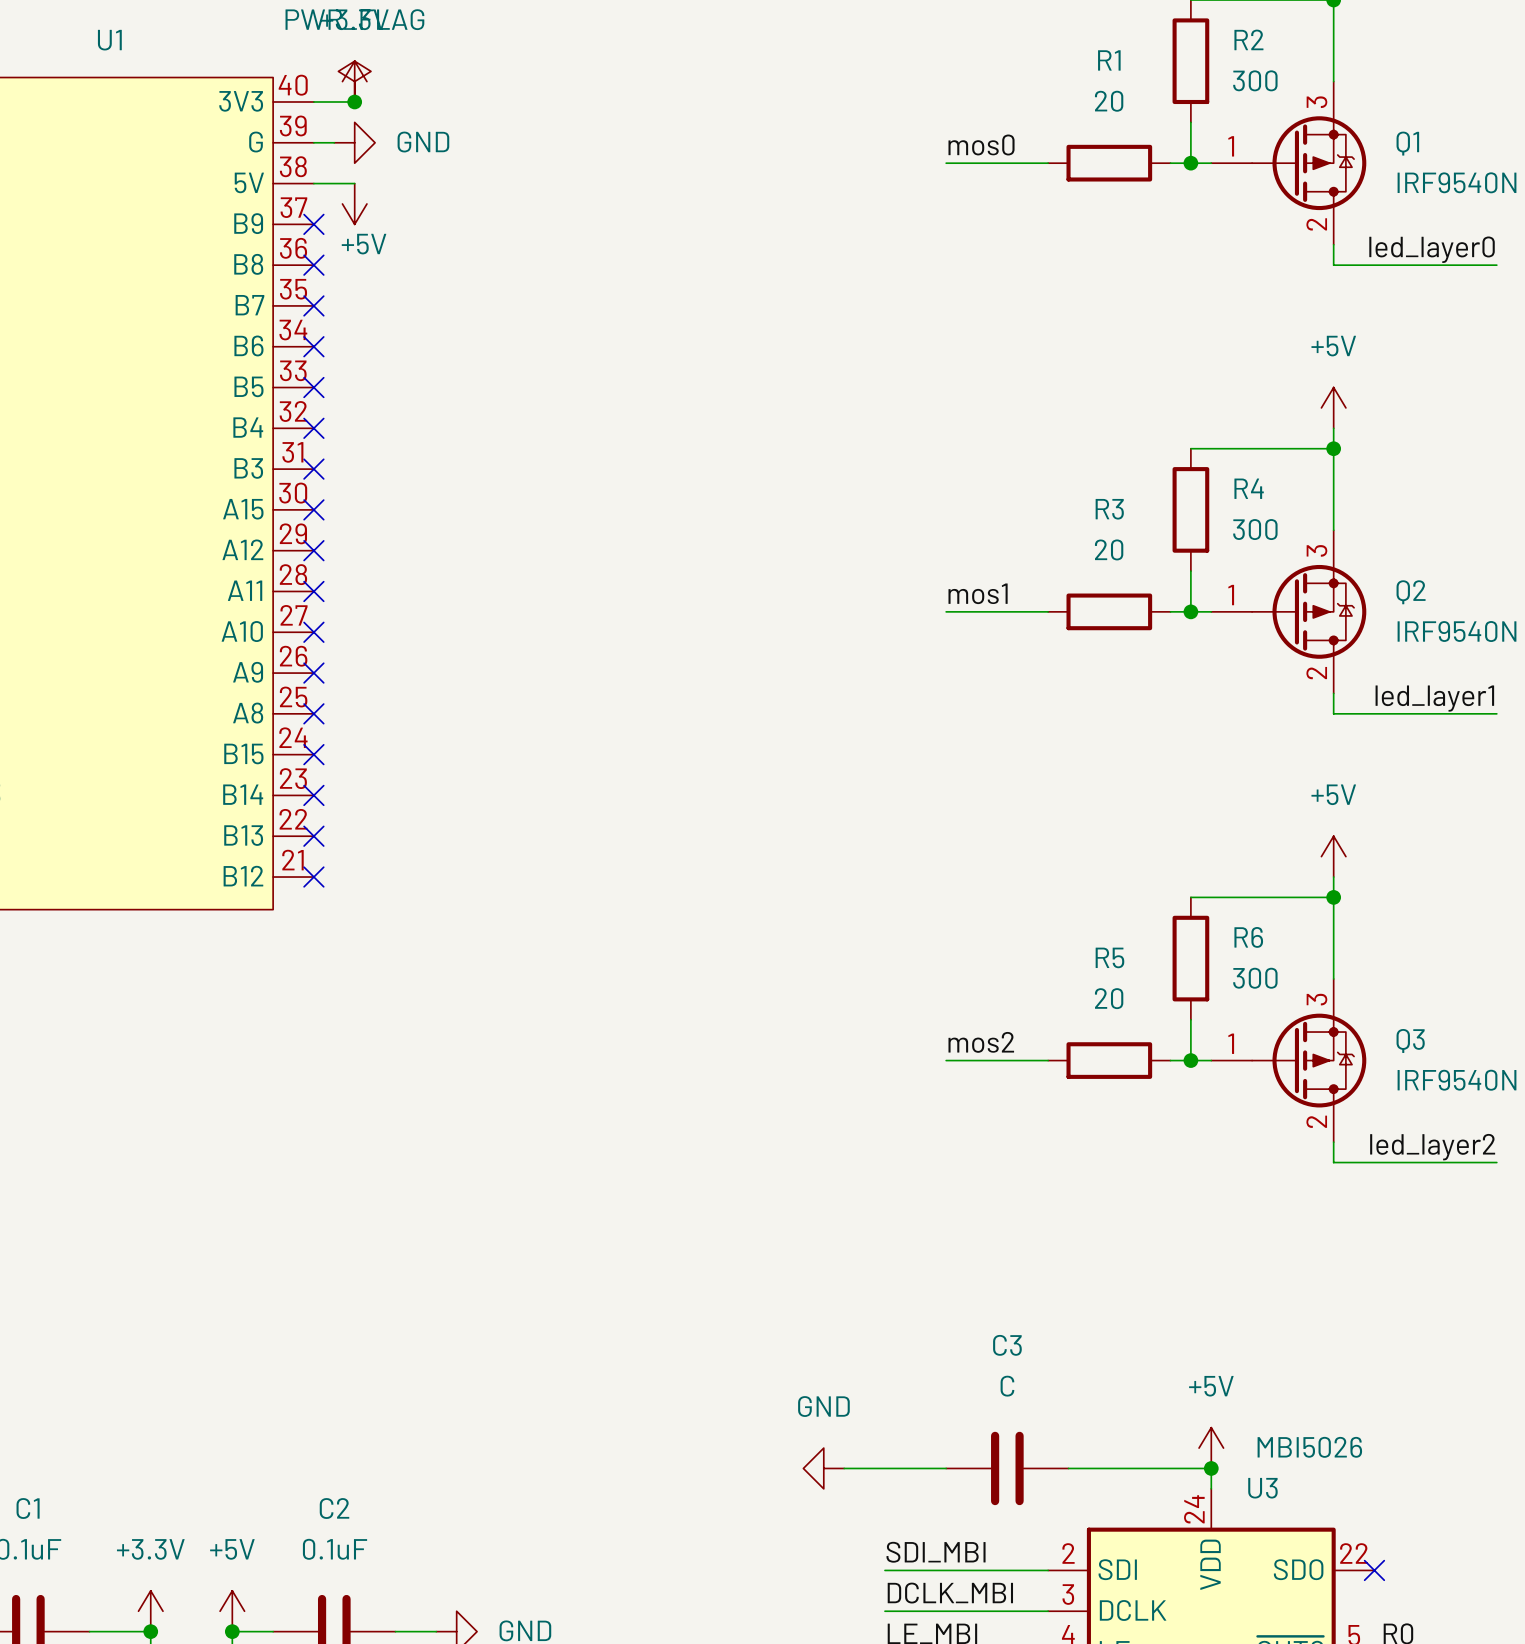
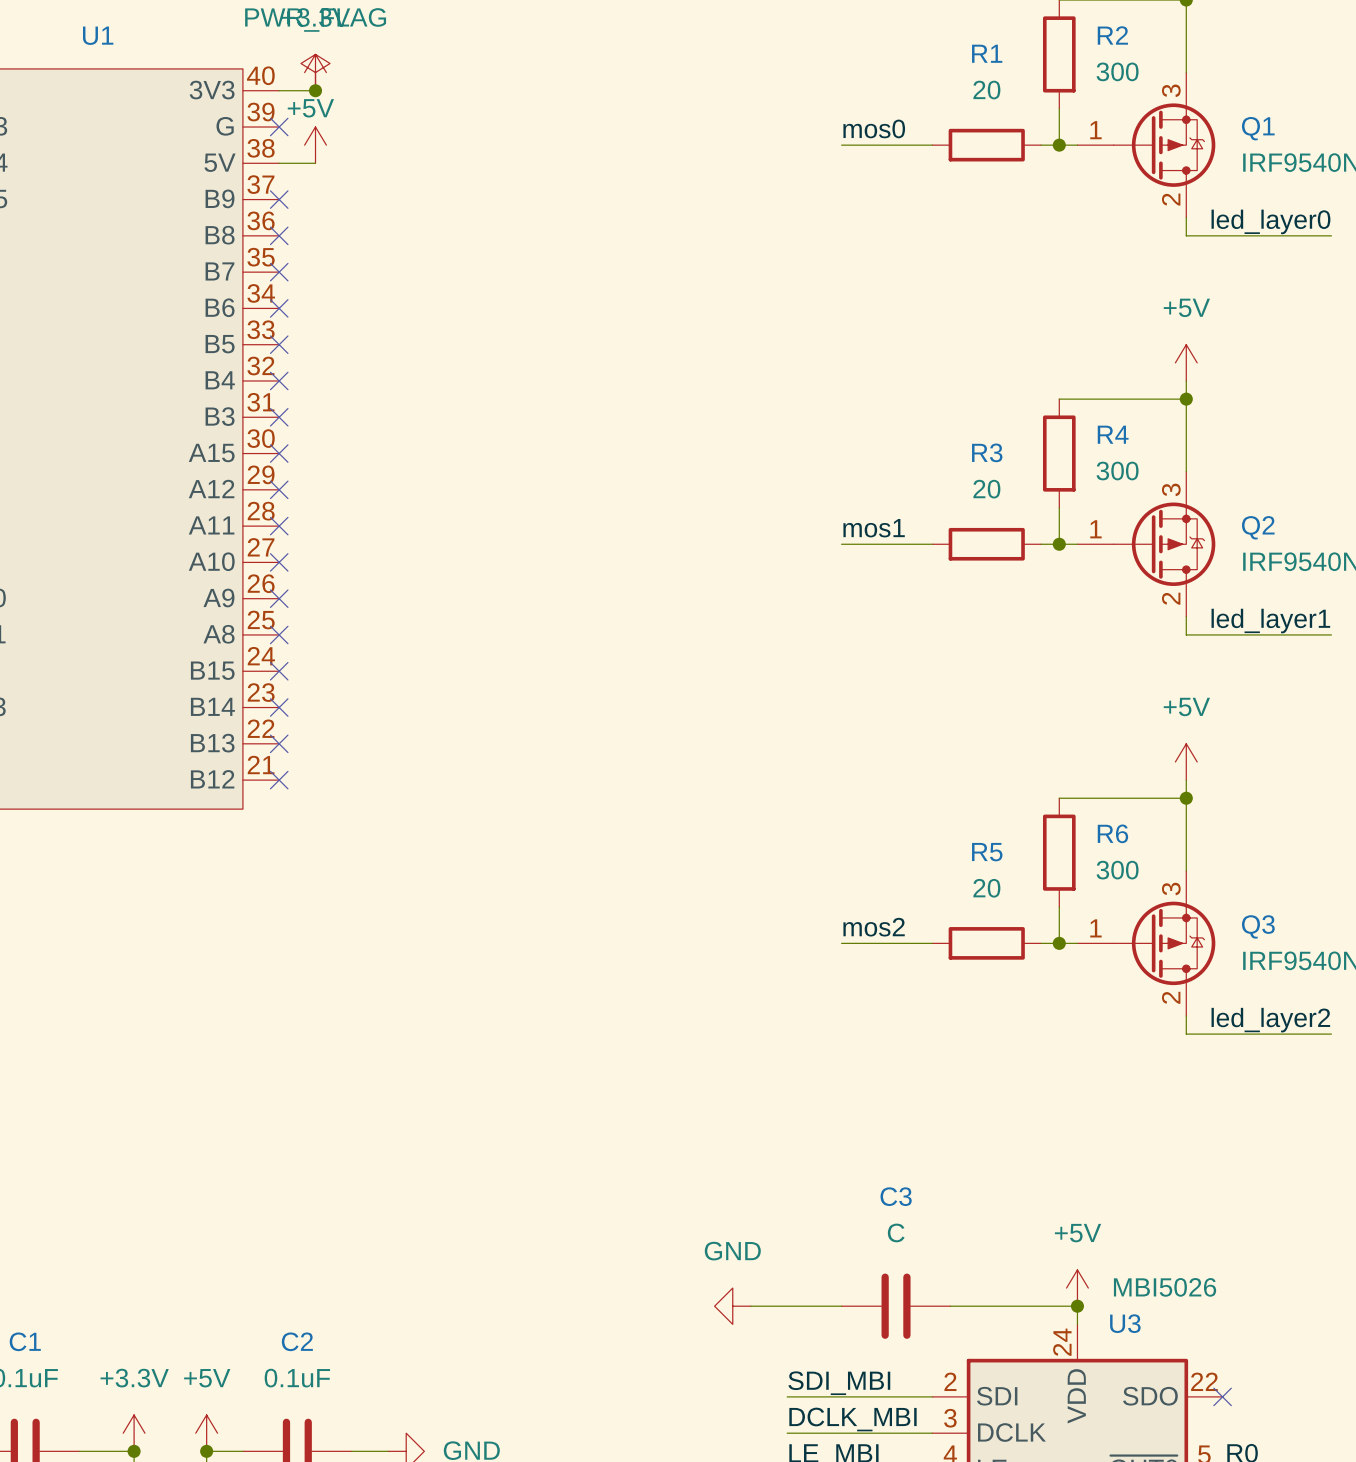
wire: (313, 142) (334, 142) -> none
no-connect mark: none -> (279, 127)
power symbol: GND (354, 142) -> none
power symbol rotation: 0° (354, 203) -> 180° (315, 145)
power symbol position: +5V (354, 203) -> +5V (315, 145)

